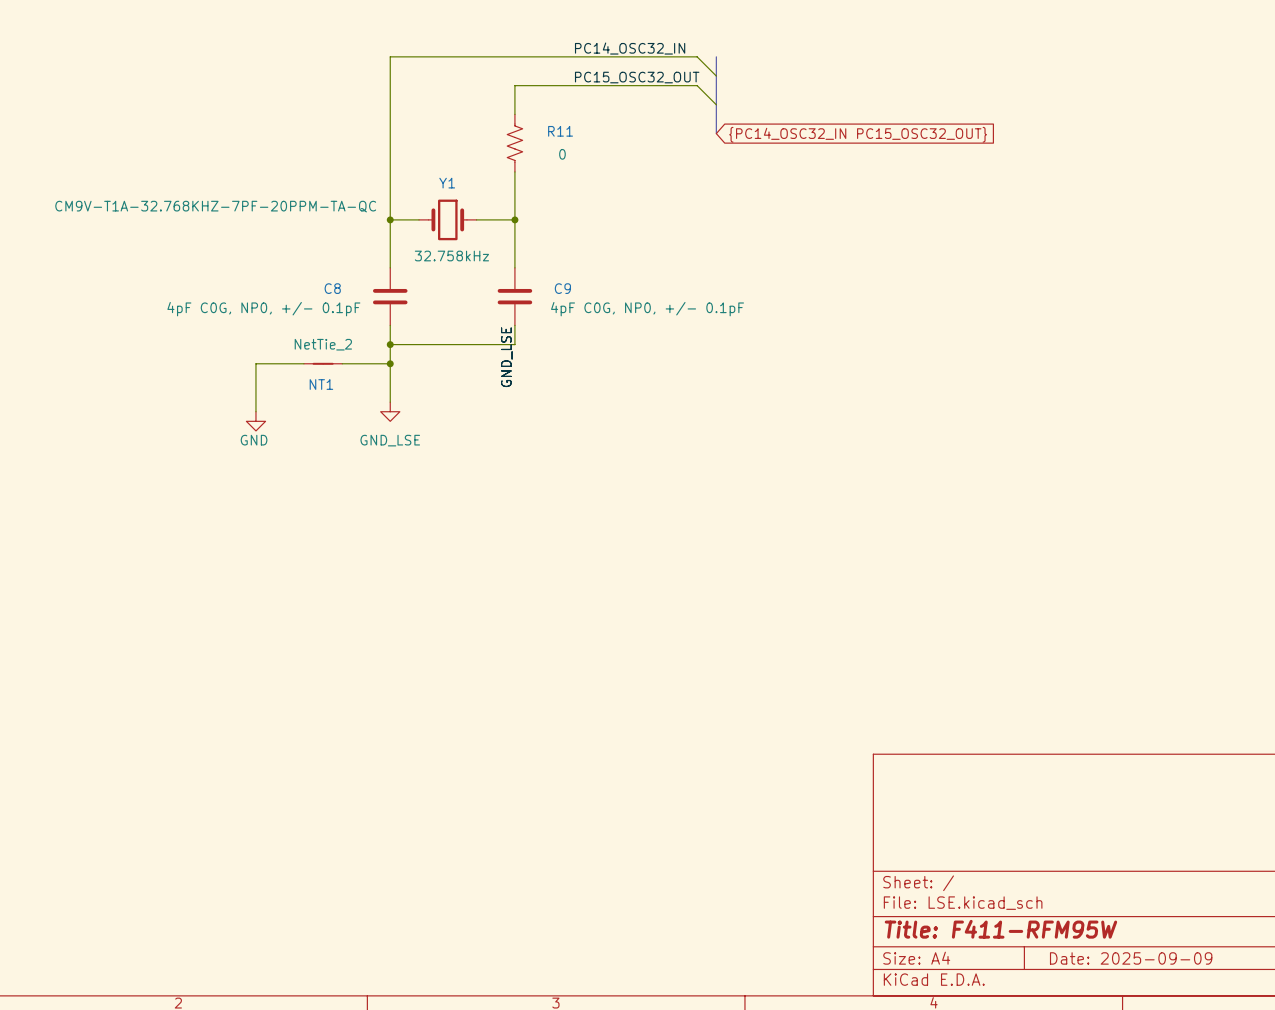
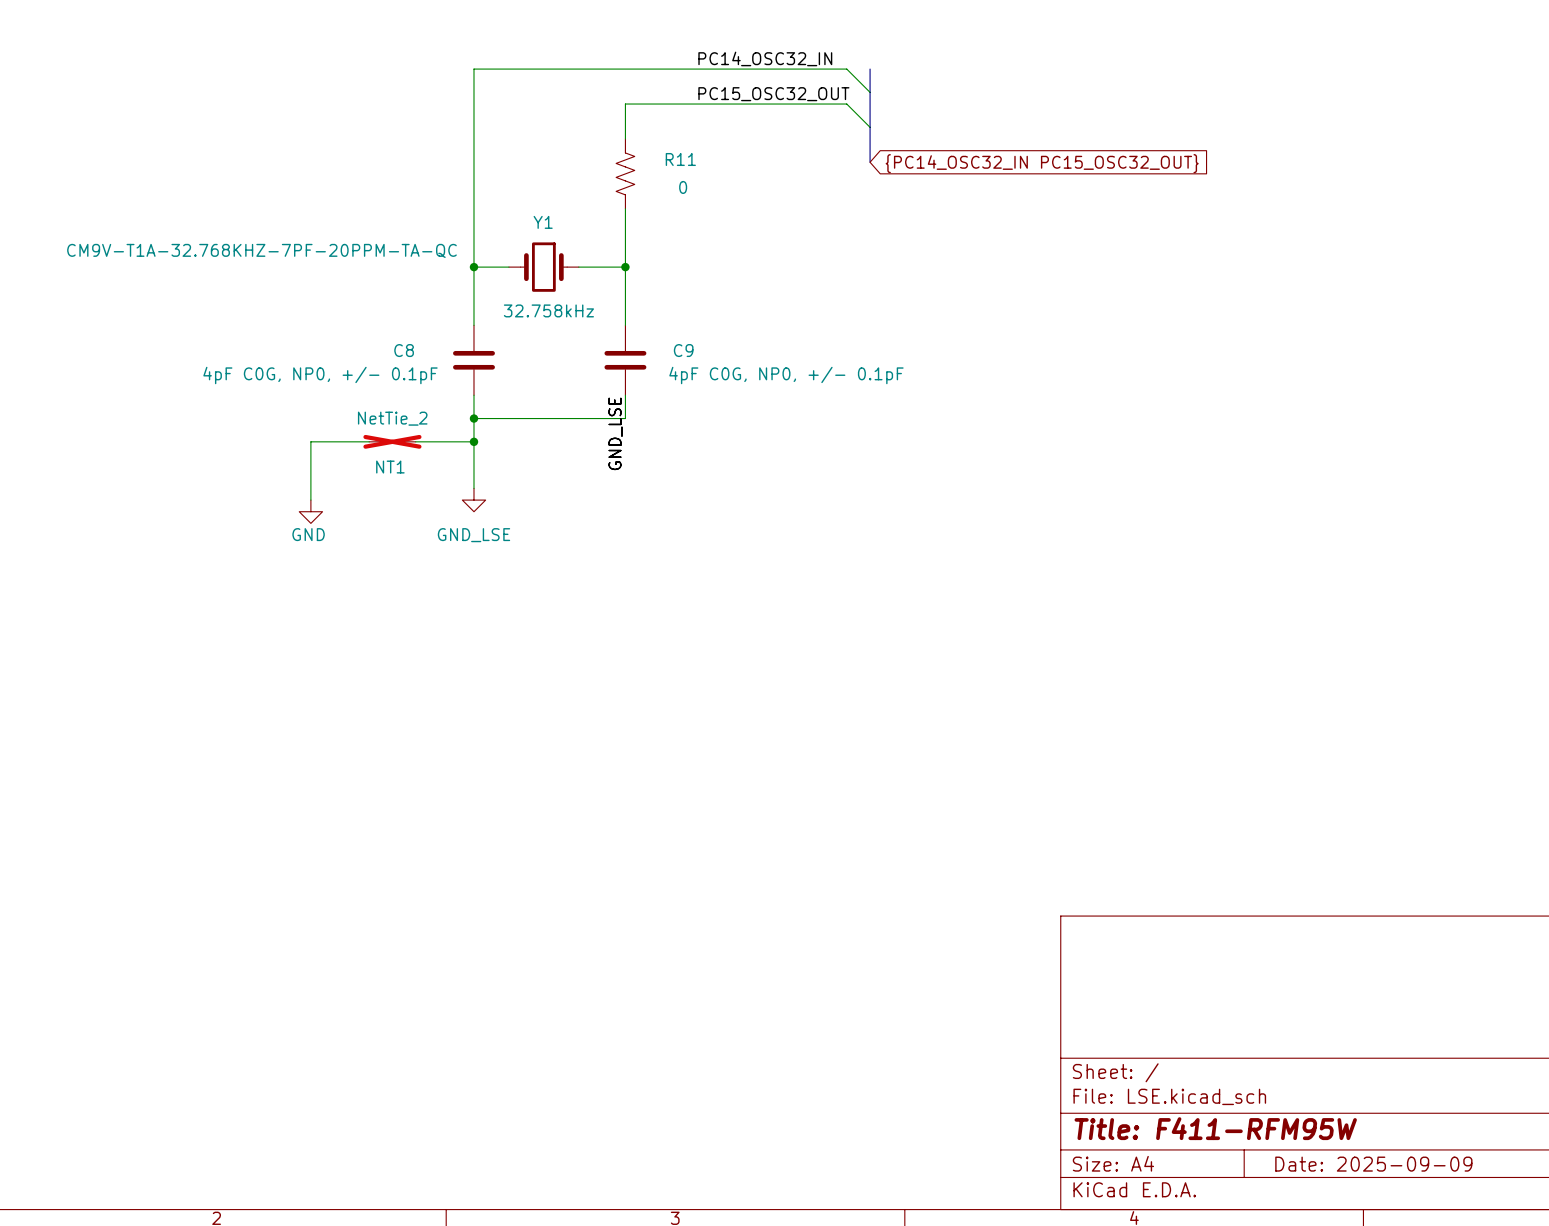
NT1 do-not-place cross: none -> (392, 441)

